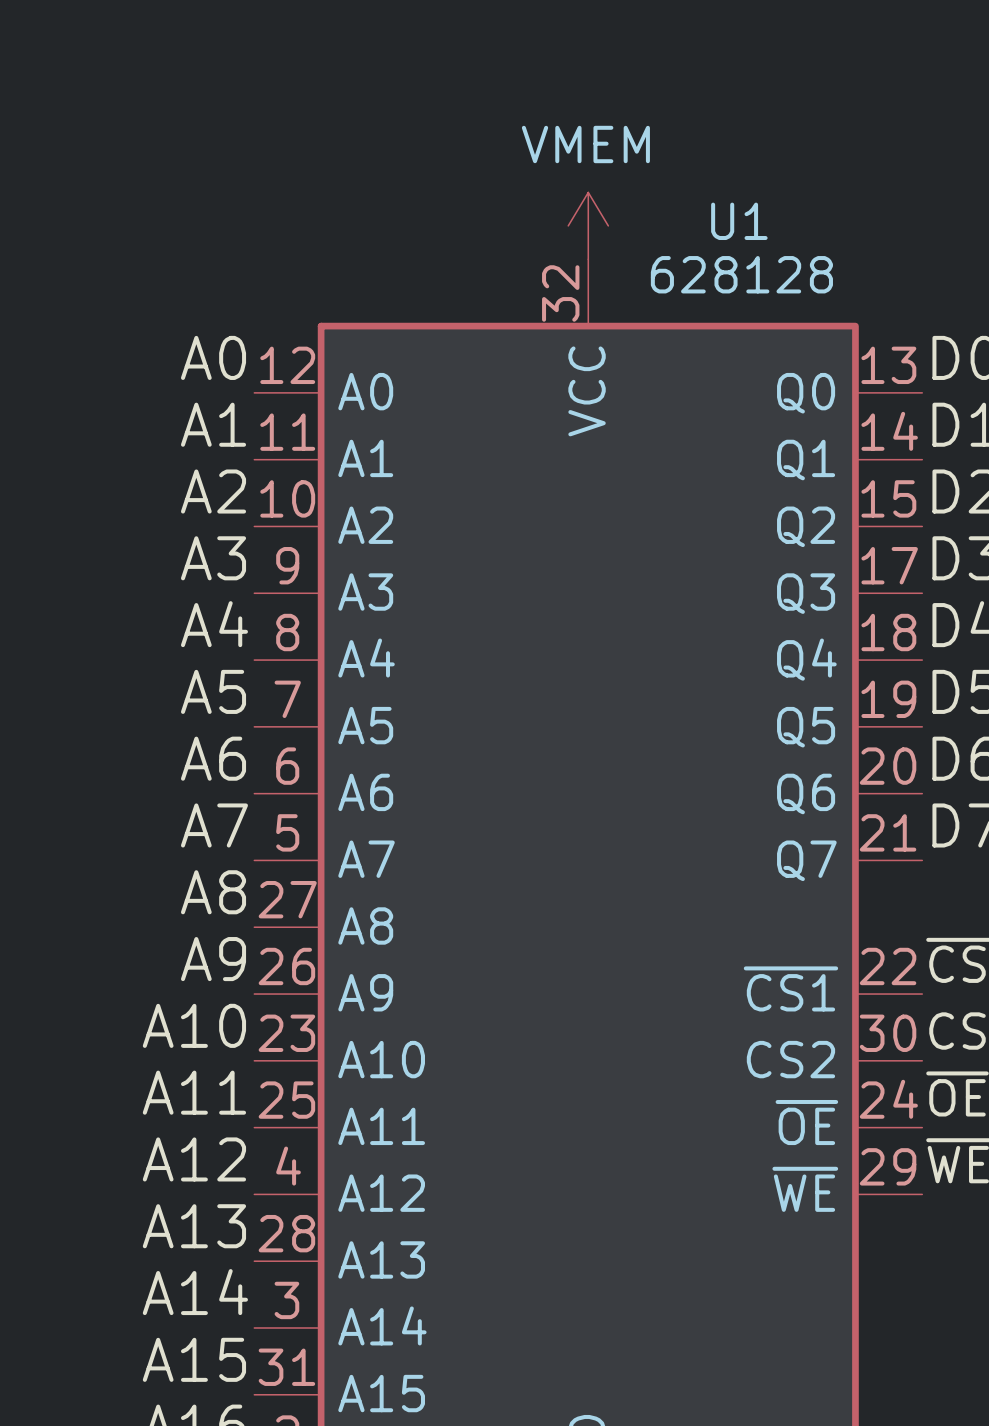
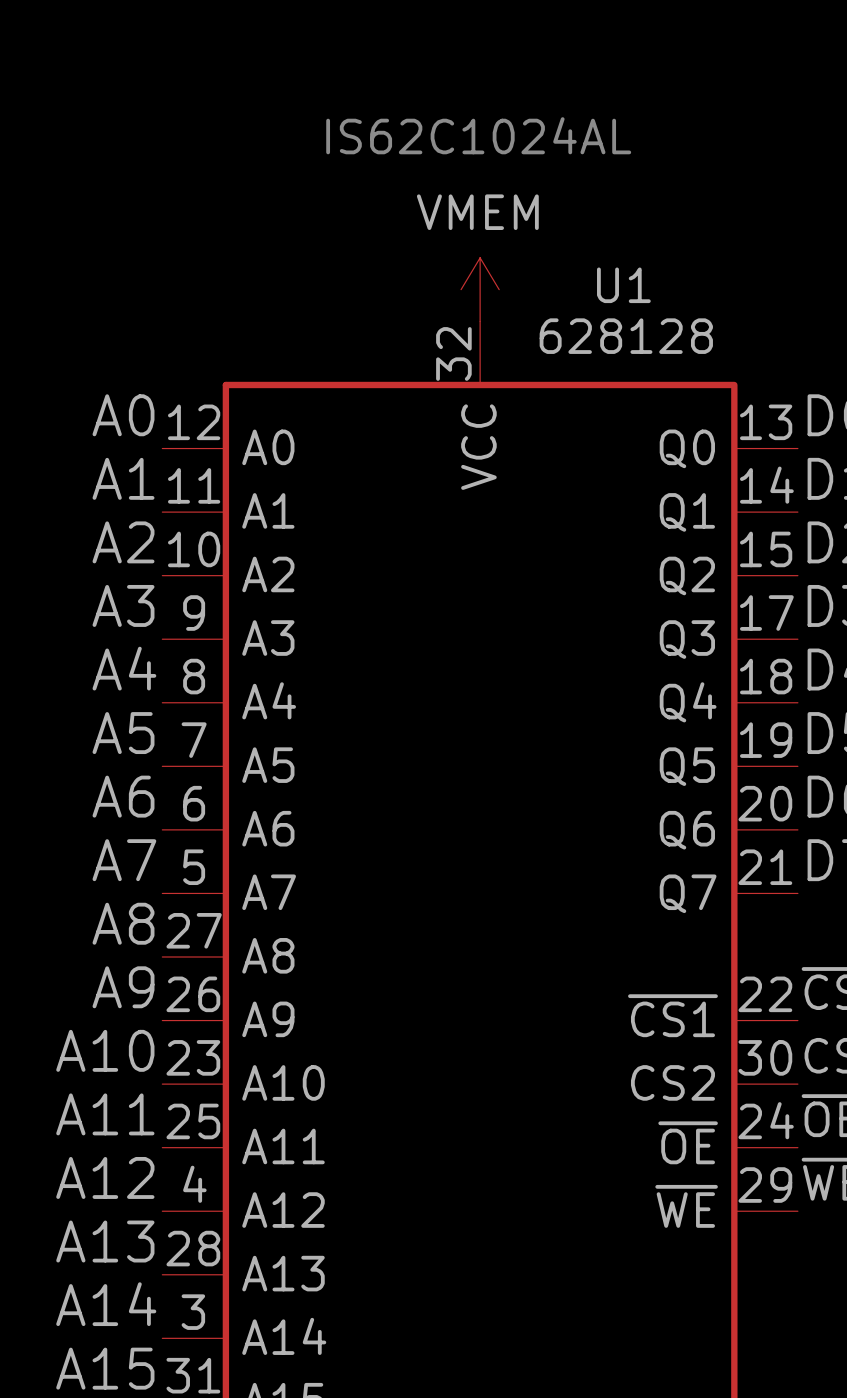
text: none -> IS62C1024AL (478, 135)

